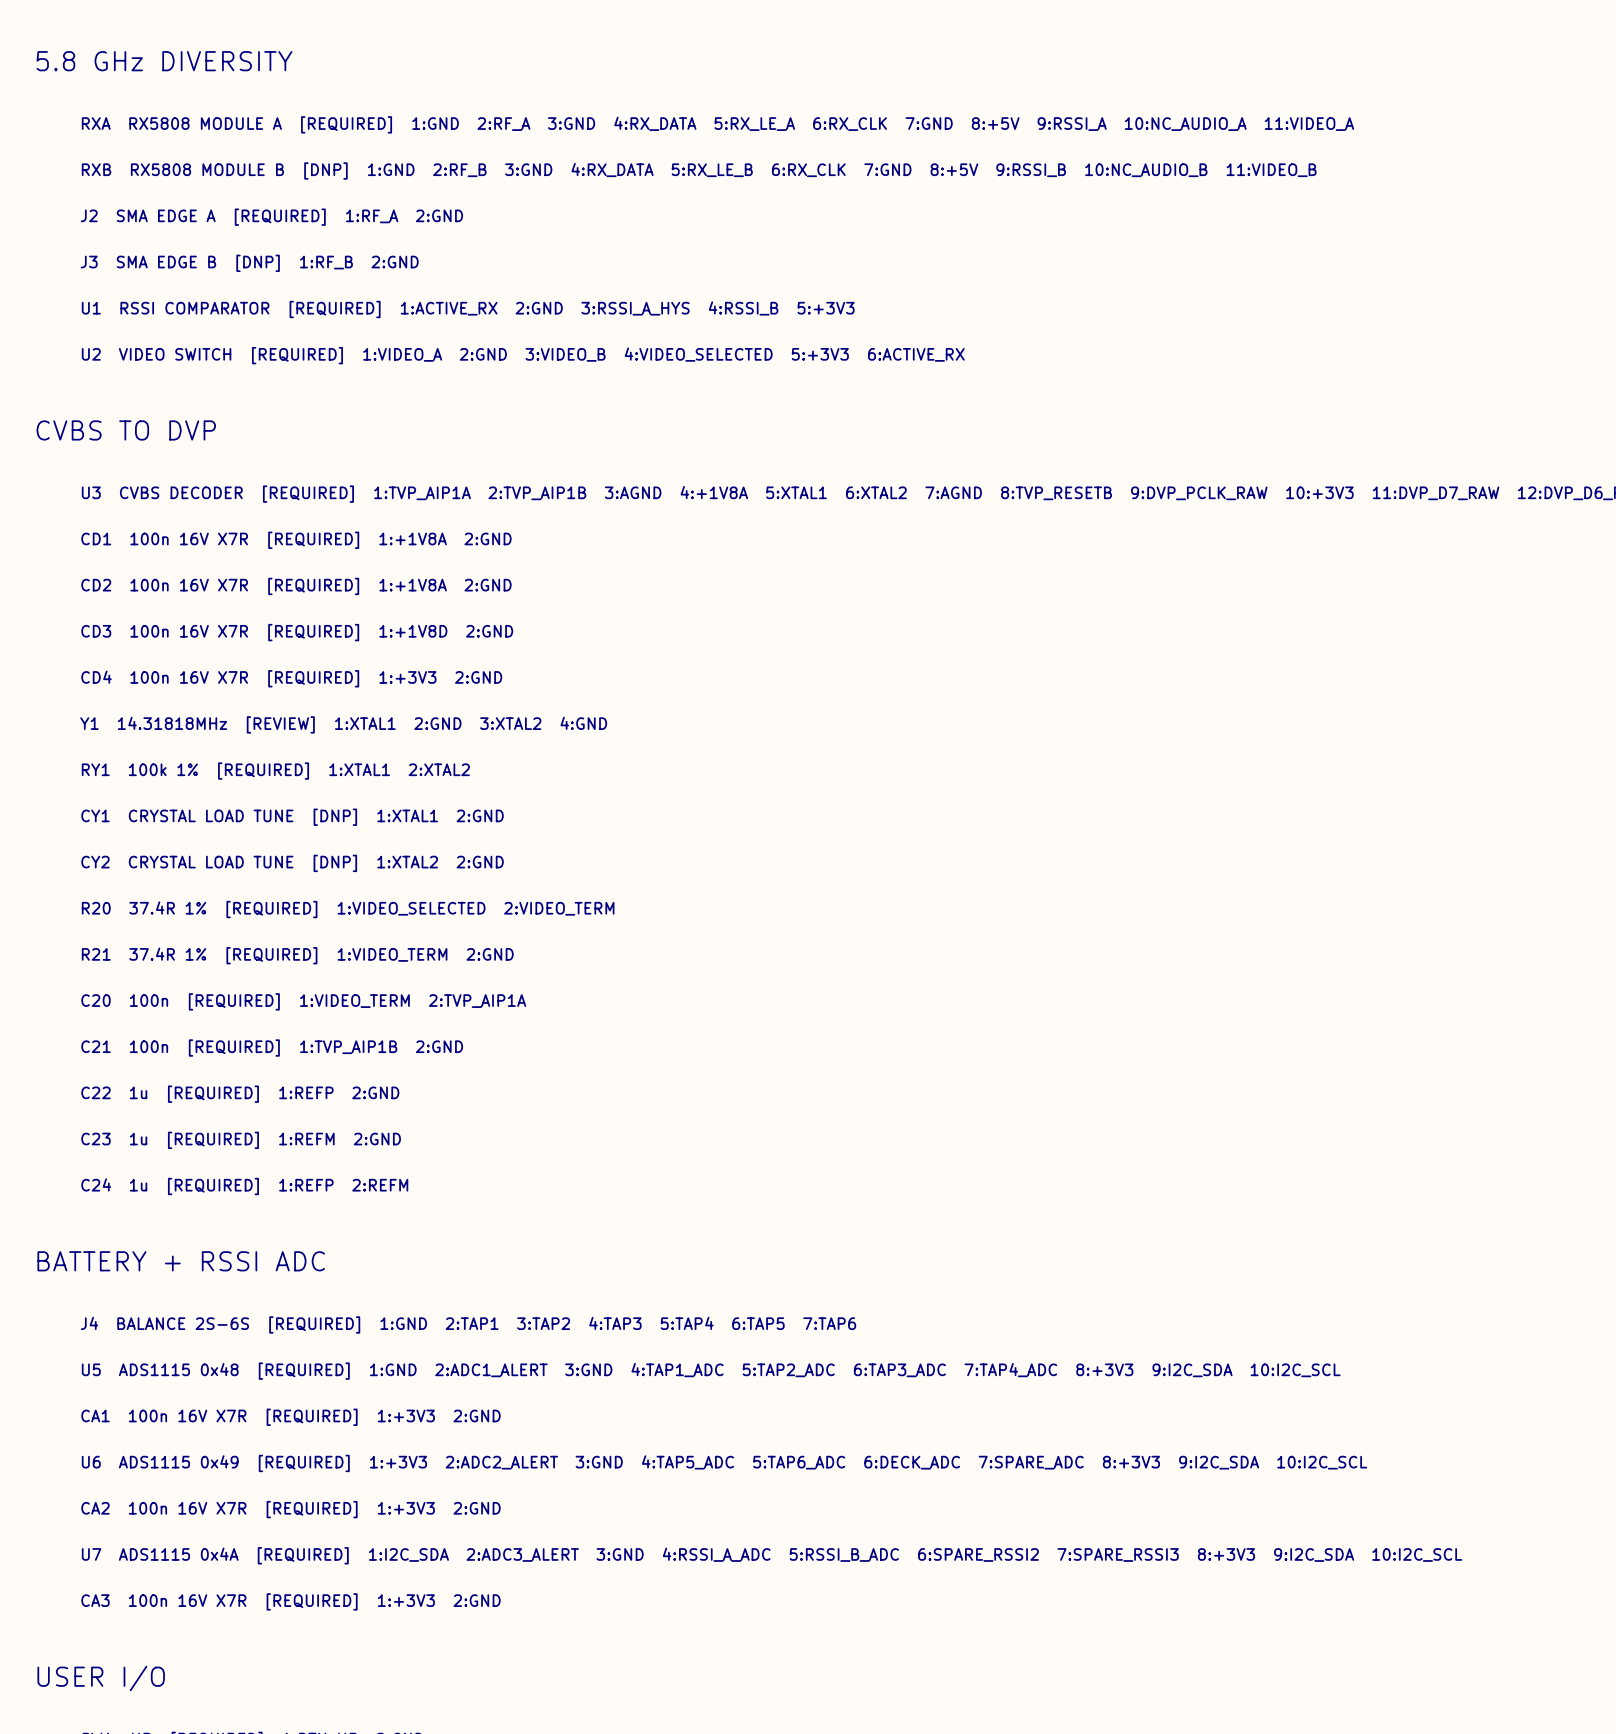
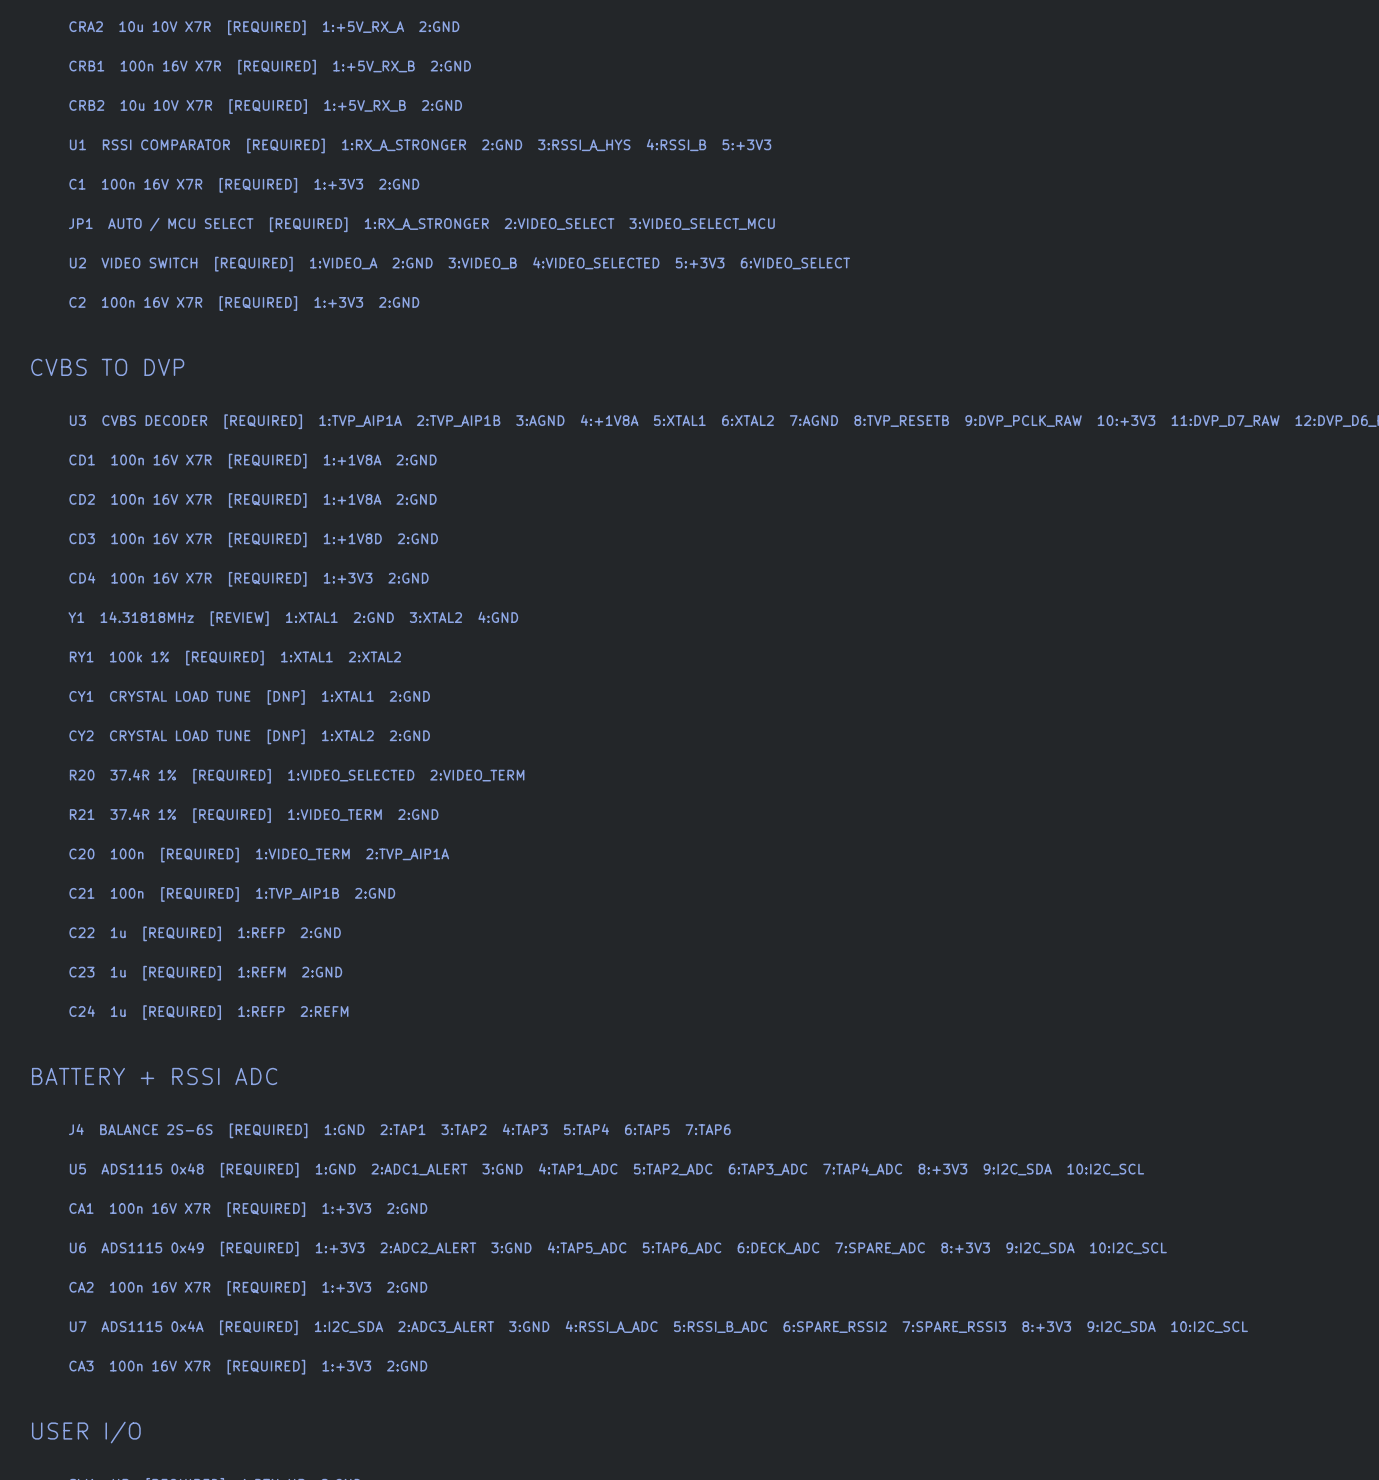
text: none -> CRA2 10u 10V X7R [REQUIRED] 1:+5V_RX_A 2:GND (264, 27)
text: 5.8 GHz DIVERSITY (164, 61) -> none
text: none -> CRB1 100n 16V X7R [REQUIRED] 1:+5V_RX_B 2:GND (270, 67)
text: RXA RX5808 MODULE A [REQUIRED] 1:GND 2:RF_A 3:GND 4:RX_DATA 5:RX_LE_A 6:RX_CLK 7:GND 8:+5V 9:RSSI_A 10:NC_AUDIO_A 11:VIDEO_A (717, 124) -> CRB2 10u 10V X7R [REQUIRED] 1:+5V_RX_B 2:GND (265, 106)
text: RXB RX5808 MODULE B [DNP] 1:GND 2:RF_B 3:GND 4:RX_DATA 5:RX_LE_B 6:RX_CLK 7:GND 8:+5V 9:RSSI_B 10:NC_AUDIO_B 11:VIDEO_B (699, 171) -> U1 RSSI COMPARATOR [REQUIRED] 1:RX_A_STRONGER 2:GND 3:RSSI_A_HYS 4:RSSI_B 5:+3V3 (420, 145)
text: J2 SMA EDGE A [REQUIRED] 1:RF_A 2:GND (271, 217) -> C1 100n 16V X7R [REQUIRED] 1:+3V3 2:GND (244, 185)
text: J3 SMA EDGE B [DNP] 1:RF_B 2:GND (249, 263) -> JP1 AUTO / MCU SELECT [REQUIRED] 1:RX_A_STRONGER 2:VIDEO_SELECT 3:VIDEO_SELECT_MCU (421, 224)
text: U1 RSSI COMPARATOR [REQUIRED] 1:ACTIVE_RX 2:GND 3:RSSI_A_HYS 4:RSSI_B 5:+3V3 (468, 309) -> U2 VIDEO SWITCH [REQUIRED] 1:VIDEO_A 2:GND 3:VIDEO_B 4:VIDEO_SELECTED 5:+3V3 6:VIDEO_SELECT (459, 264)
text: U2 VIDEO SWITCH [REQUIRED] 1:VIDEO_A 2:GND 3:VIDEO_B 4:VIDEO_SELECTED 5:+3V3 6:ACTIVE_RX (523, 355) -> C2 100n 16V X7R [REQUIRED] 1:+3V3 2:GND (244, 303)

